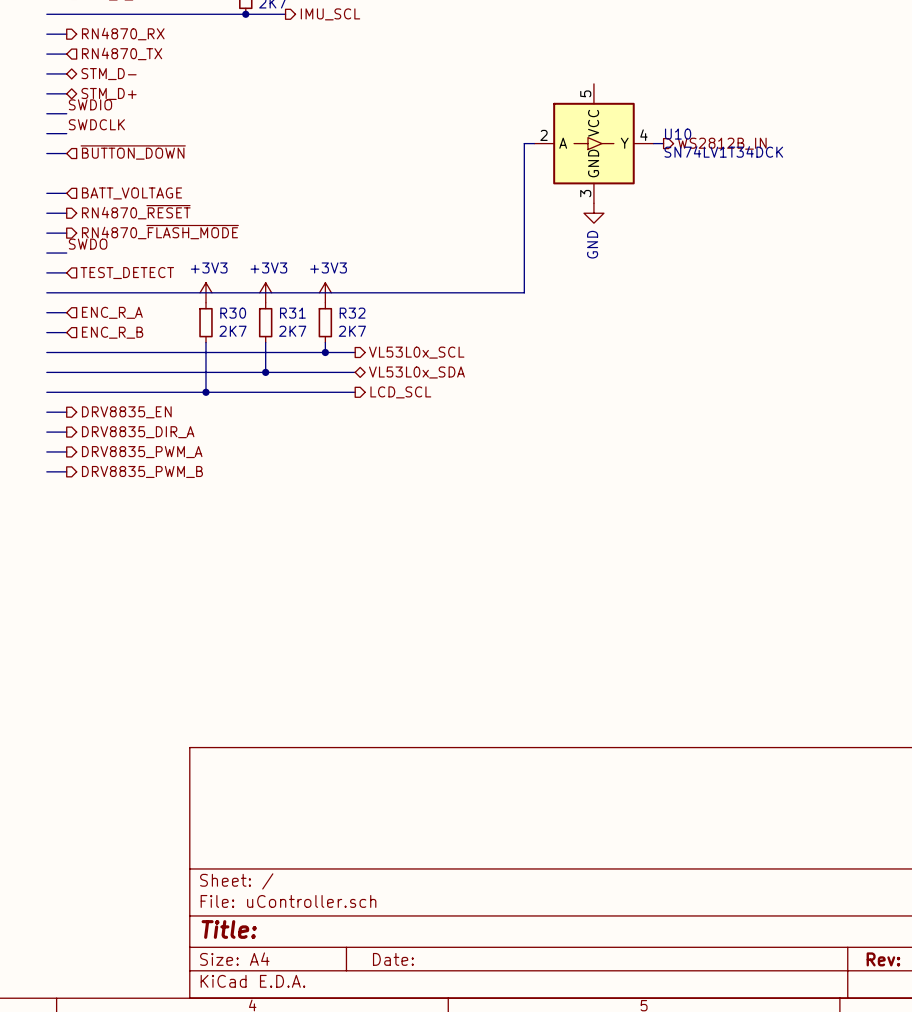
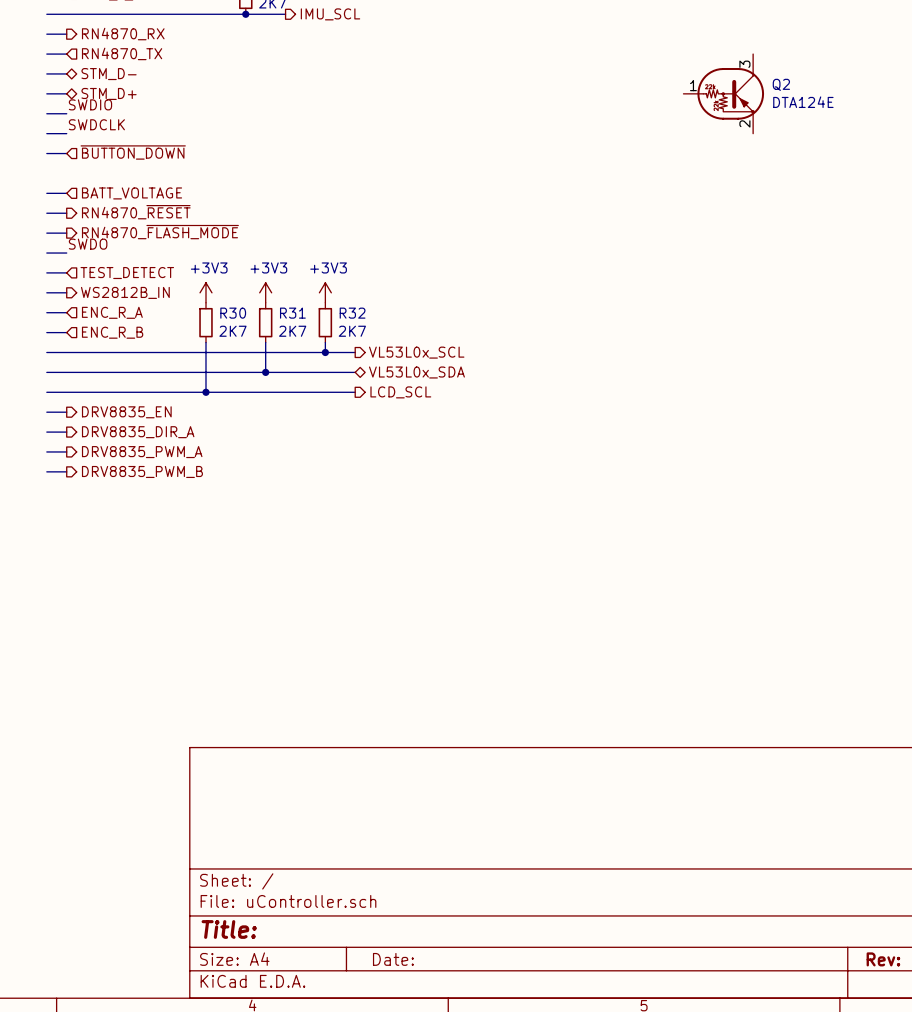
Q2: none -> DTA124E (723, 93)
wire: (534, 143) (524, 143) (524, 292) (66, 292) -> none
U10: SN74LV1T34DCK (593, 143) -> none
wire: (653, 143) (663, 143) -> none
hierarchical label: WS2812B_IN (722, 143) -> none
power symbol: GND (593, 213) -> none
hierarchical label: none -> WS2812B_IN (125, 292)

